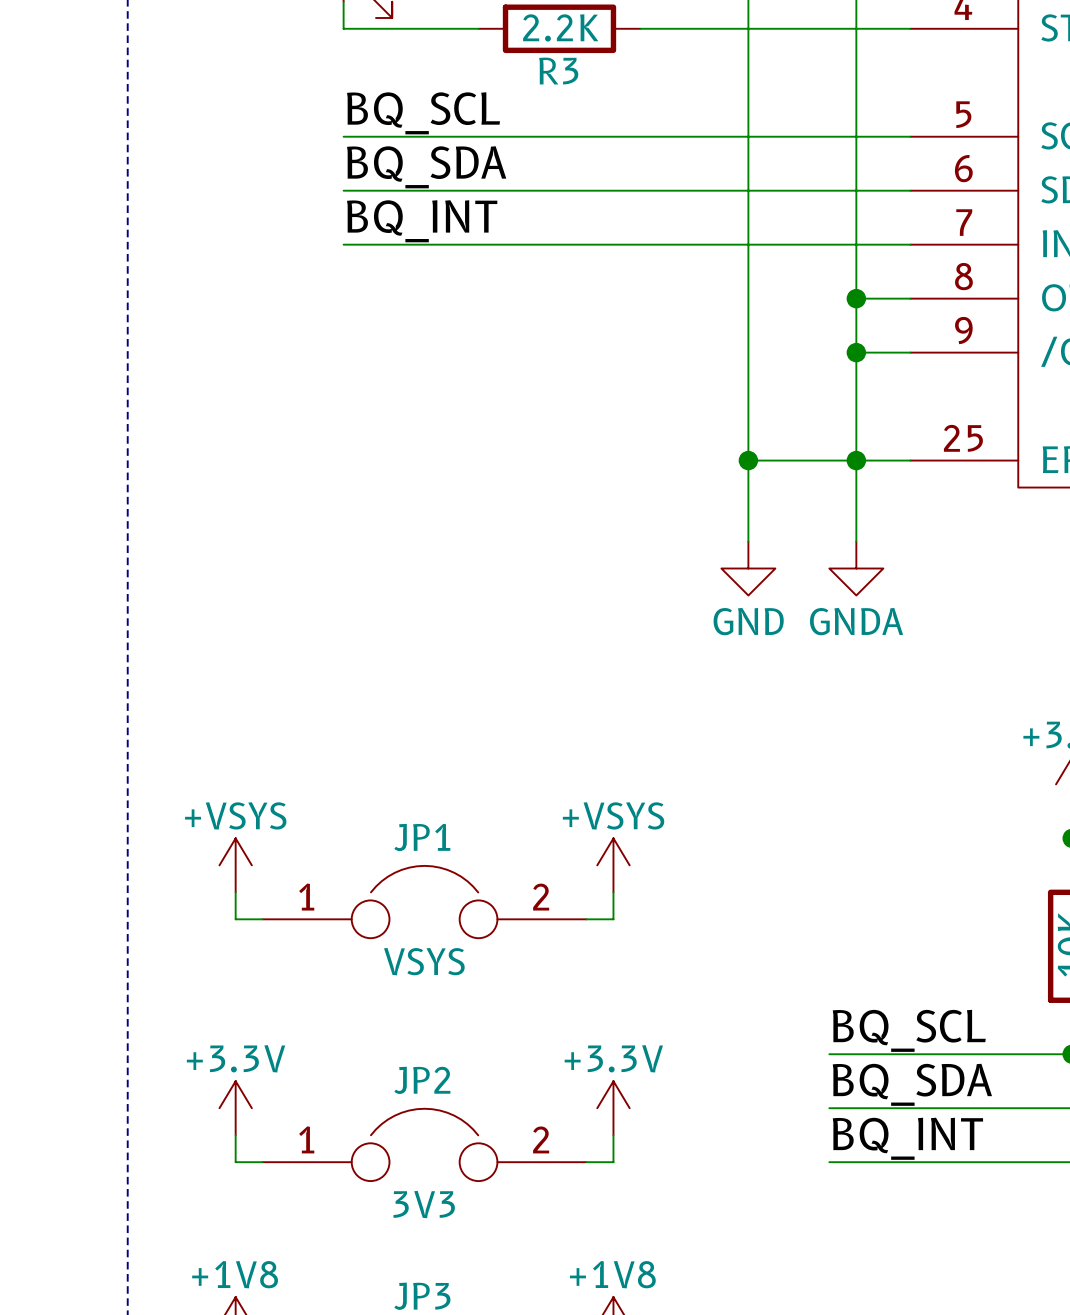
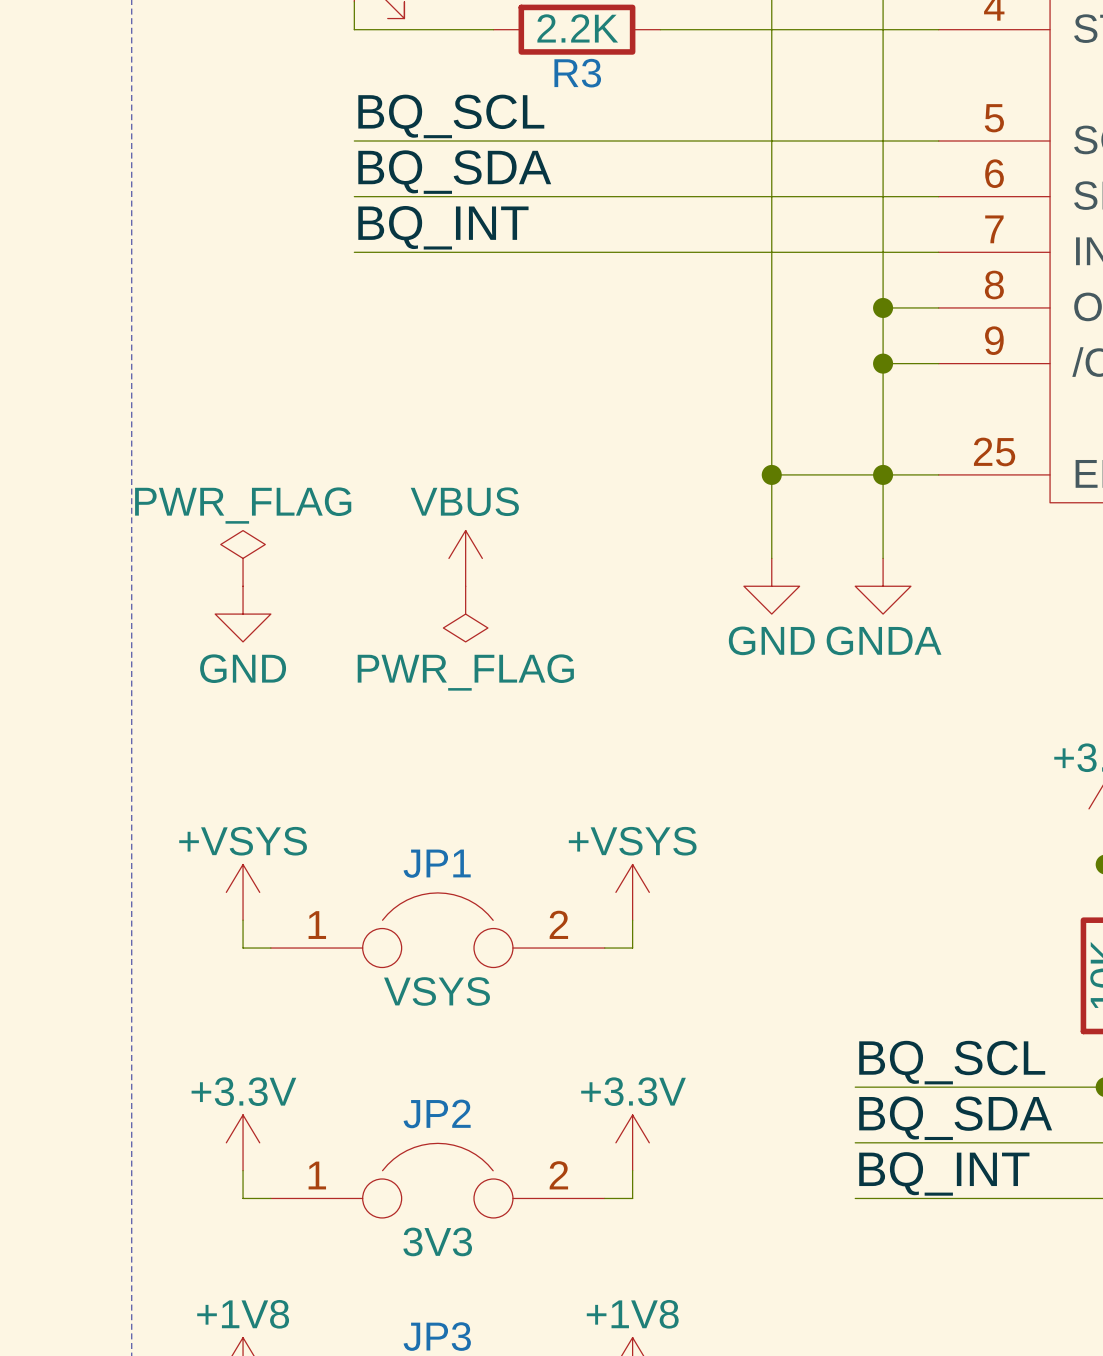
power symbol: none -> PWR_FLAG (243, 558)
power symbol: none -> VBUS (465, 558)
power symbol: none -> GND (243, 614)
power symbol: none -> PWR_FLAG (465, 614)

